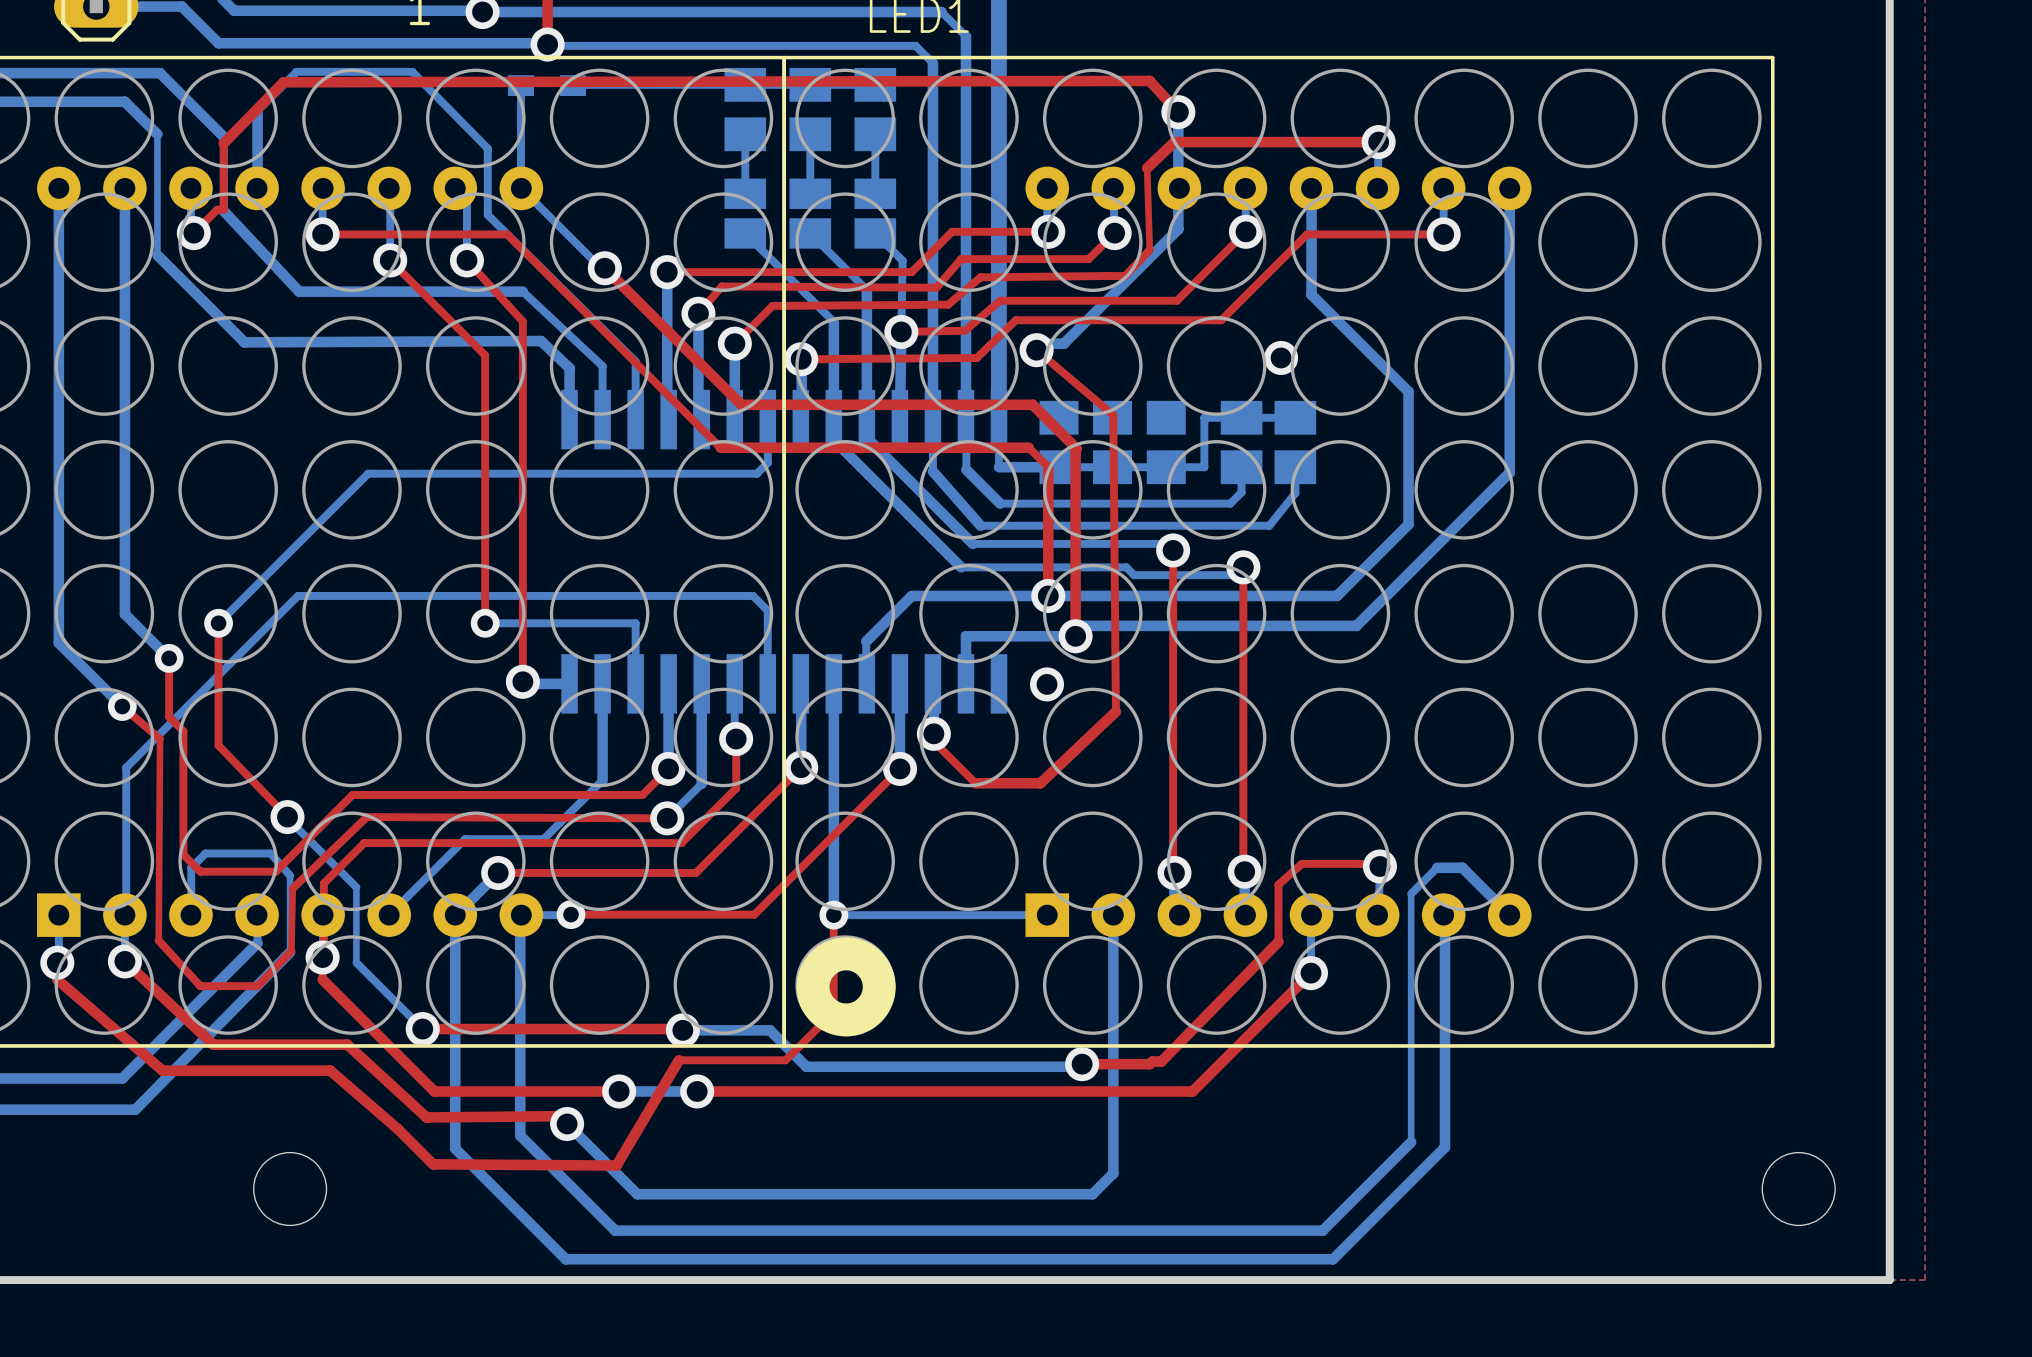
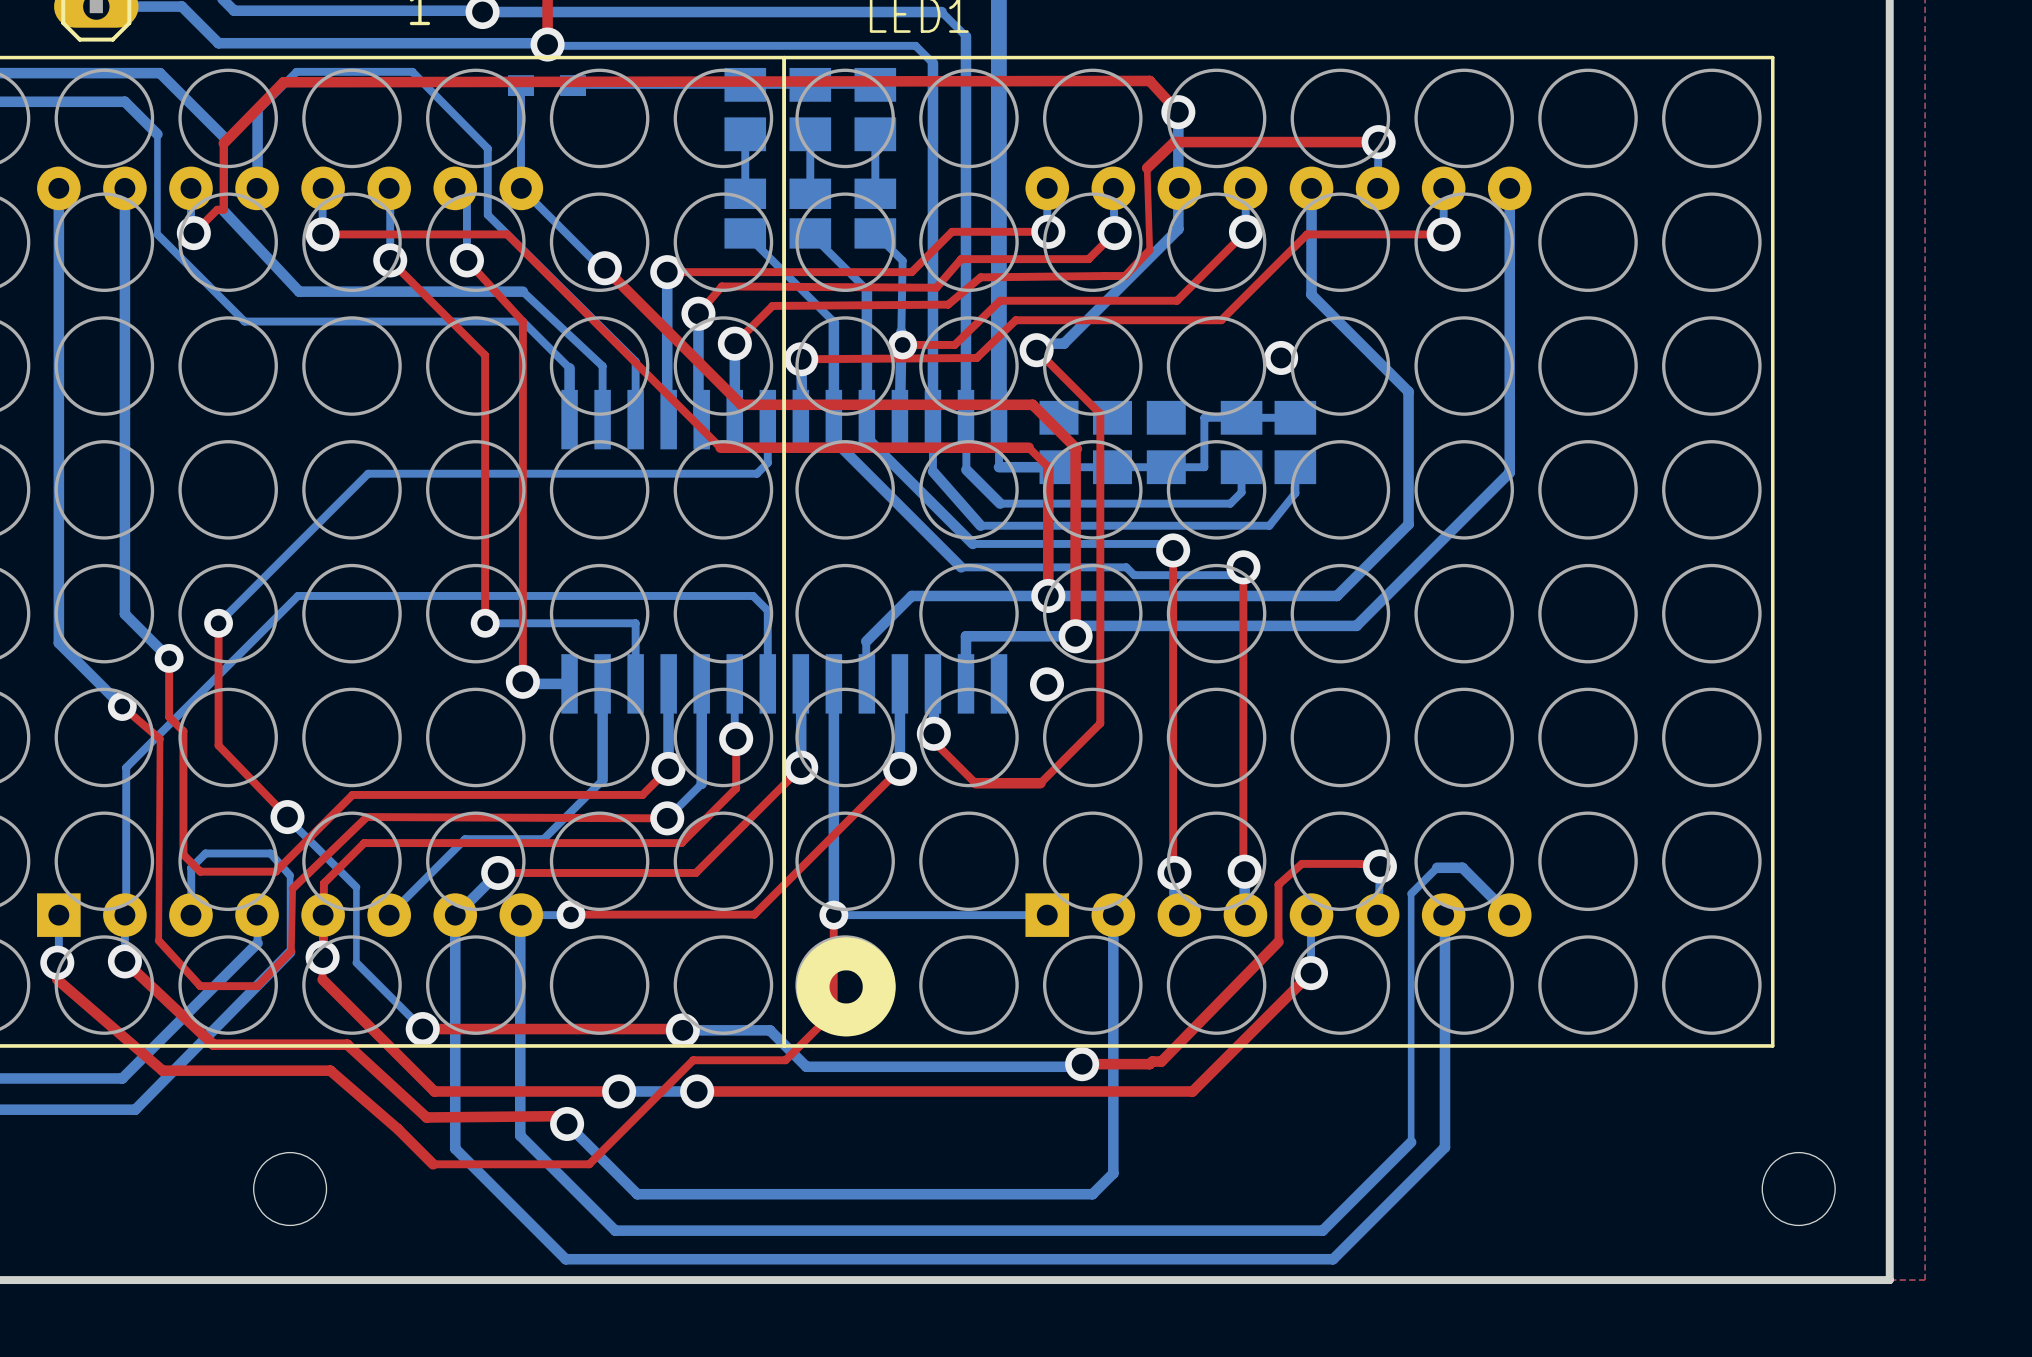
bottom track: (157, 234) (157, 255) (244, 342) (541, 341) (569, 368) -> (157, 234) (244, 321) (522, 321) (569, 368)
top track: (1000, 300) (965, 330) (901, 331) -> (1000, 300) (954, 344) (902, 344)
via position: (901, 331) -> (902, 344)
top track: (1036, 350) (1113, 415) (1115, 711) (1040, 783) -> (1036, 350) (1100, 413) (1100, 723) (1040, 783)
top track: (693, 1060) (678, 1060) (616, 1165) (433, 1164) -> (693, 1060) (589, 1164) (433, 1164)

